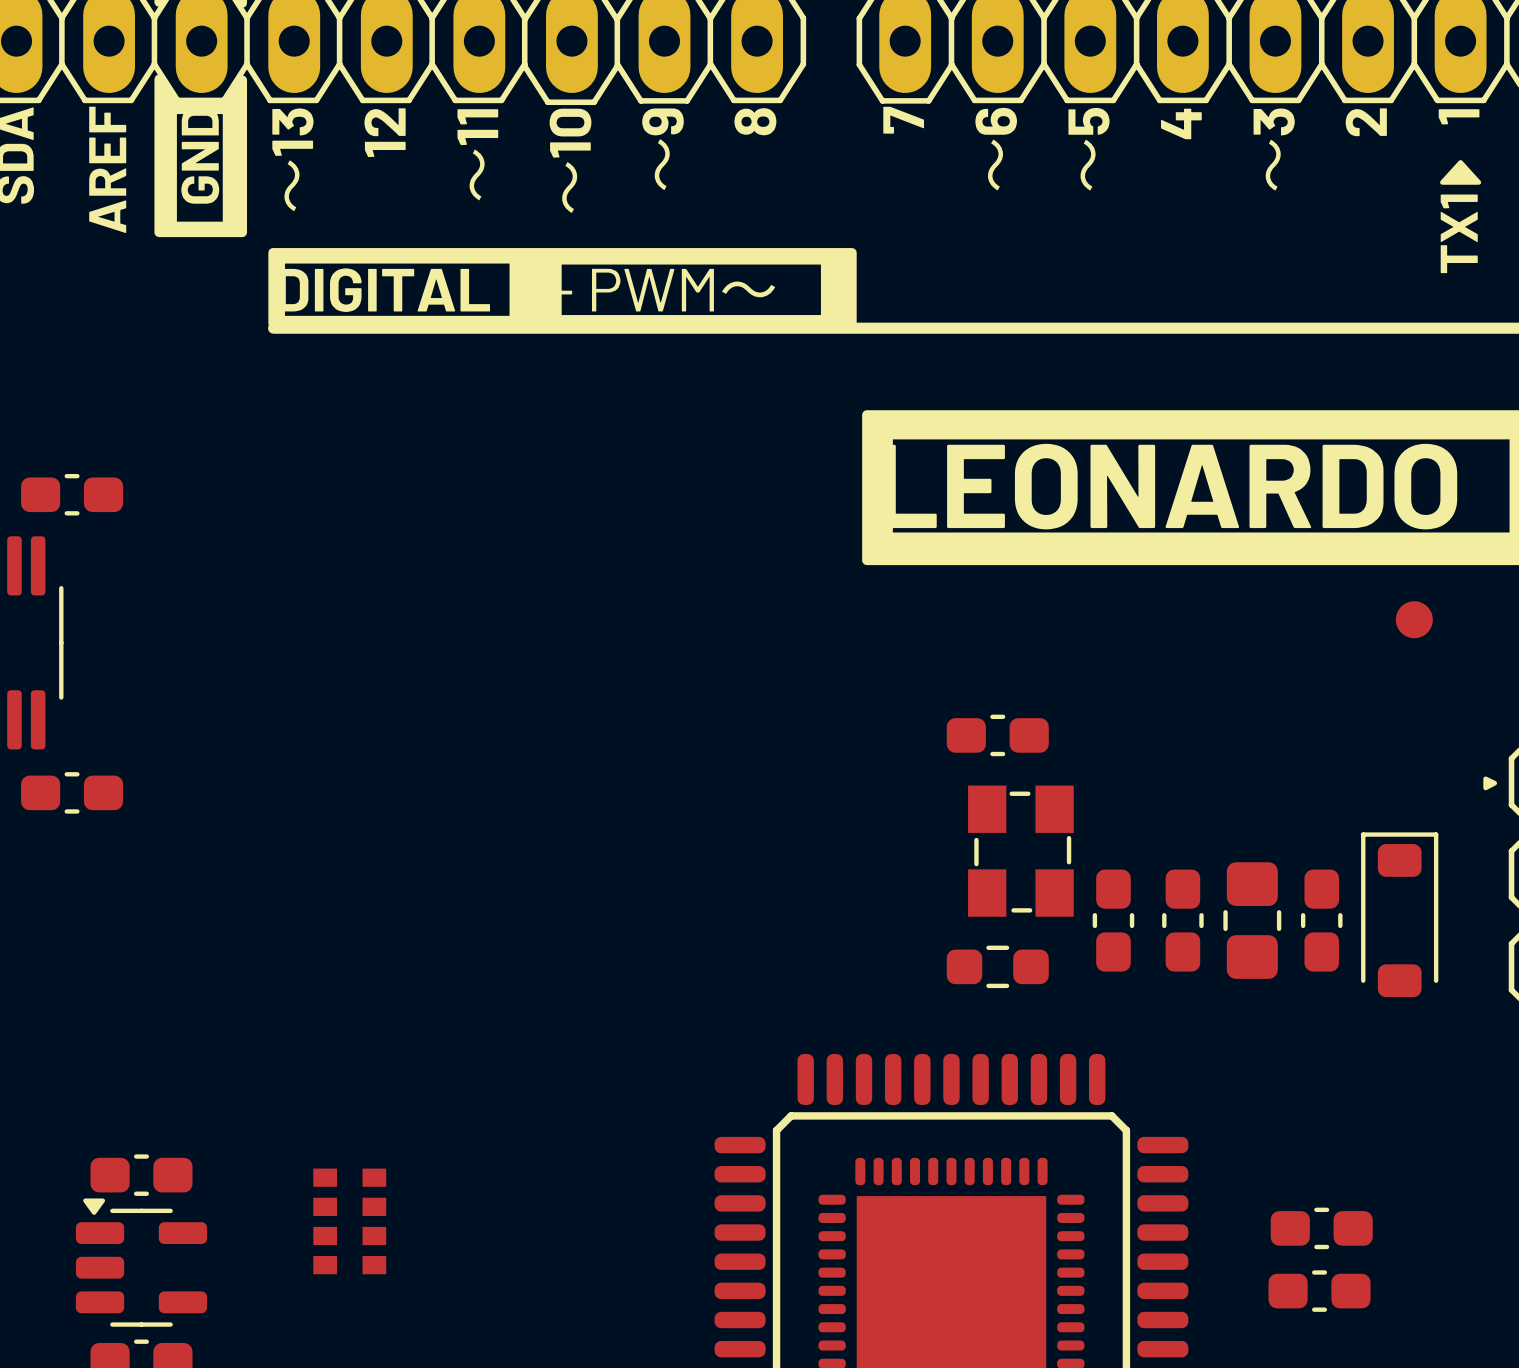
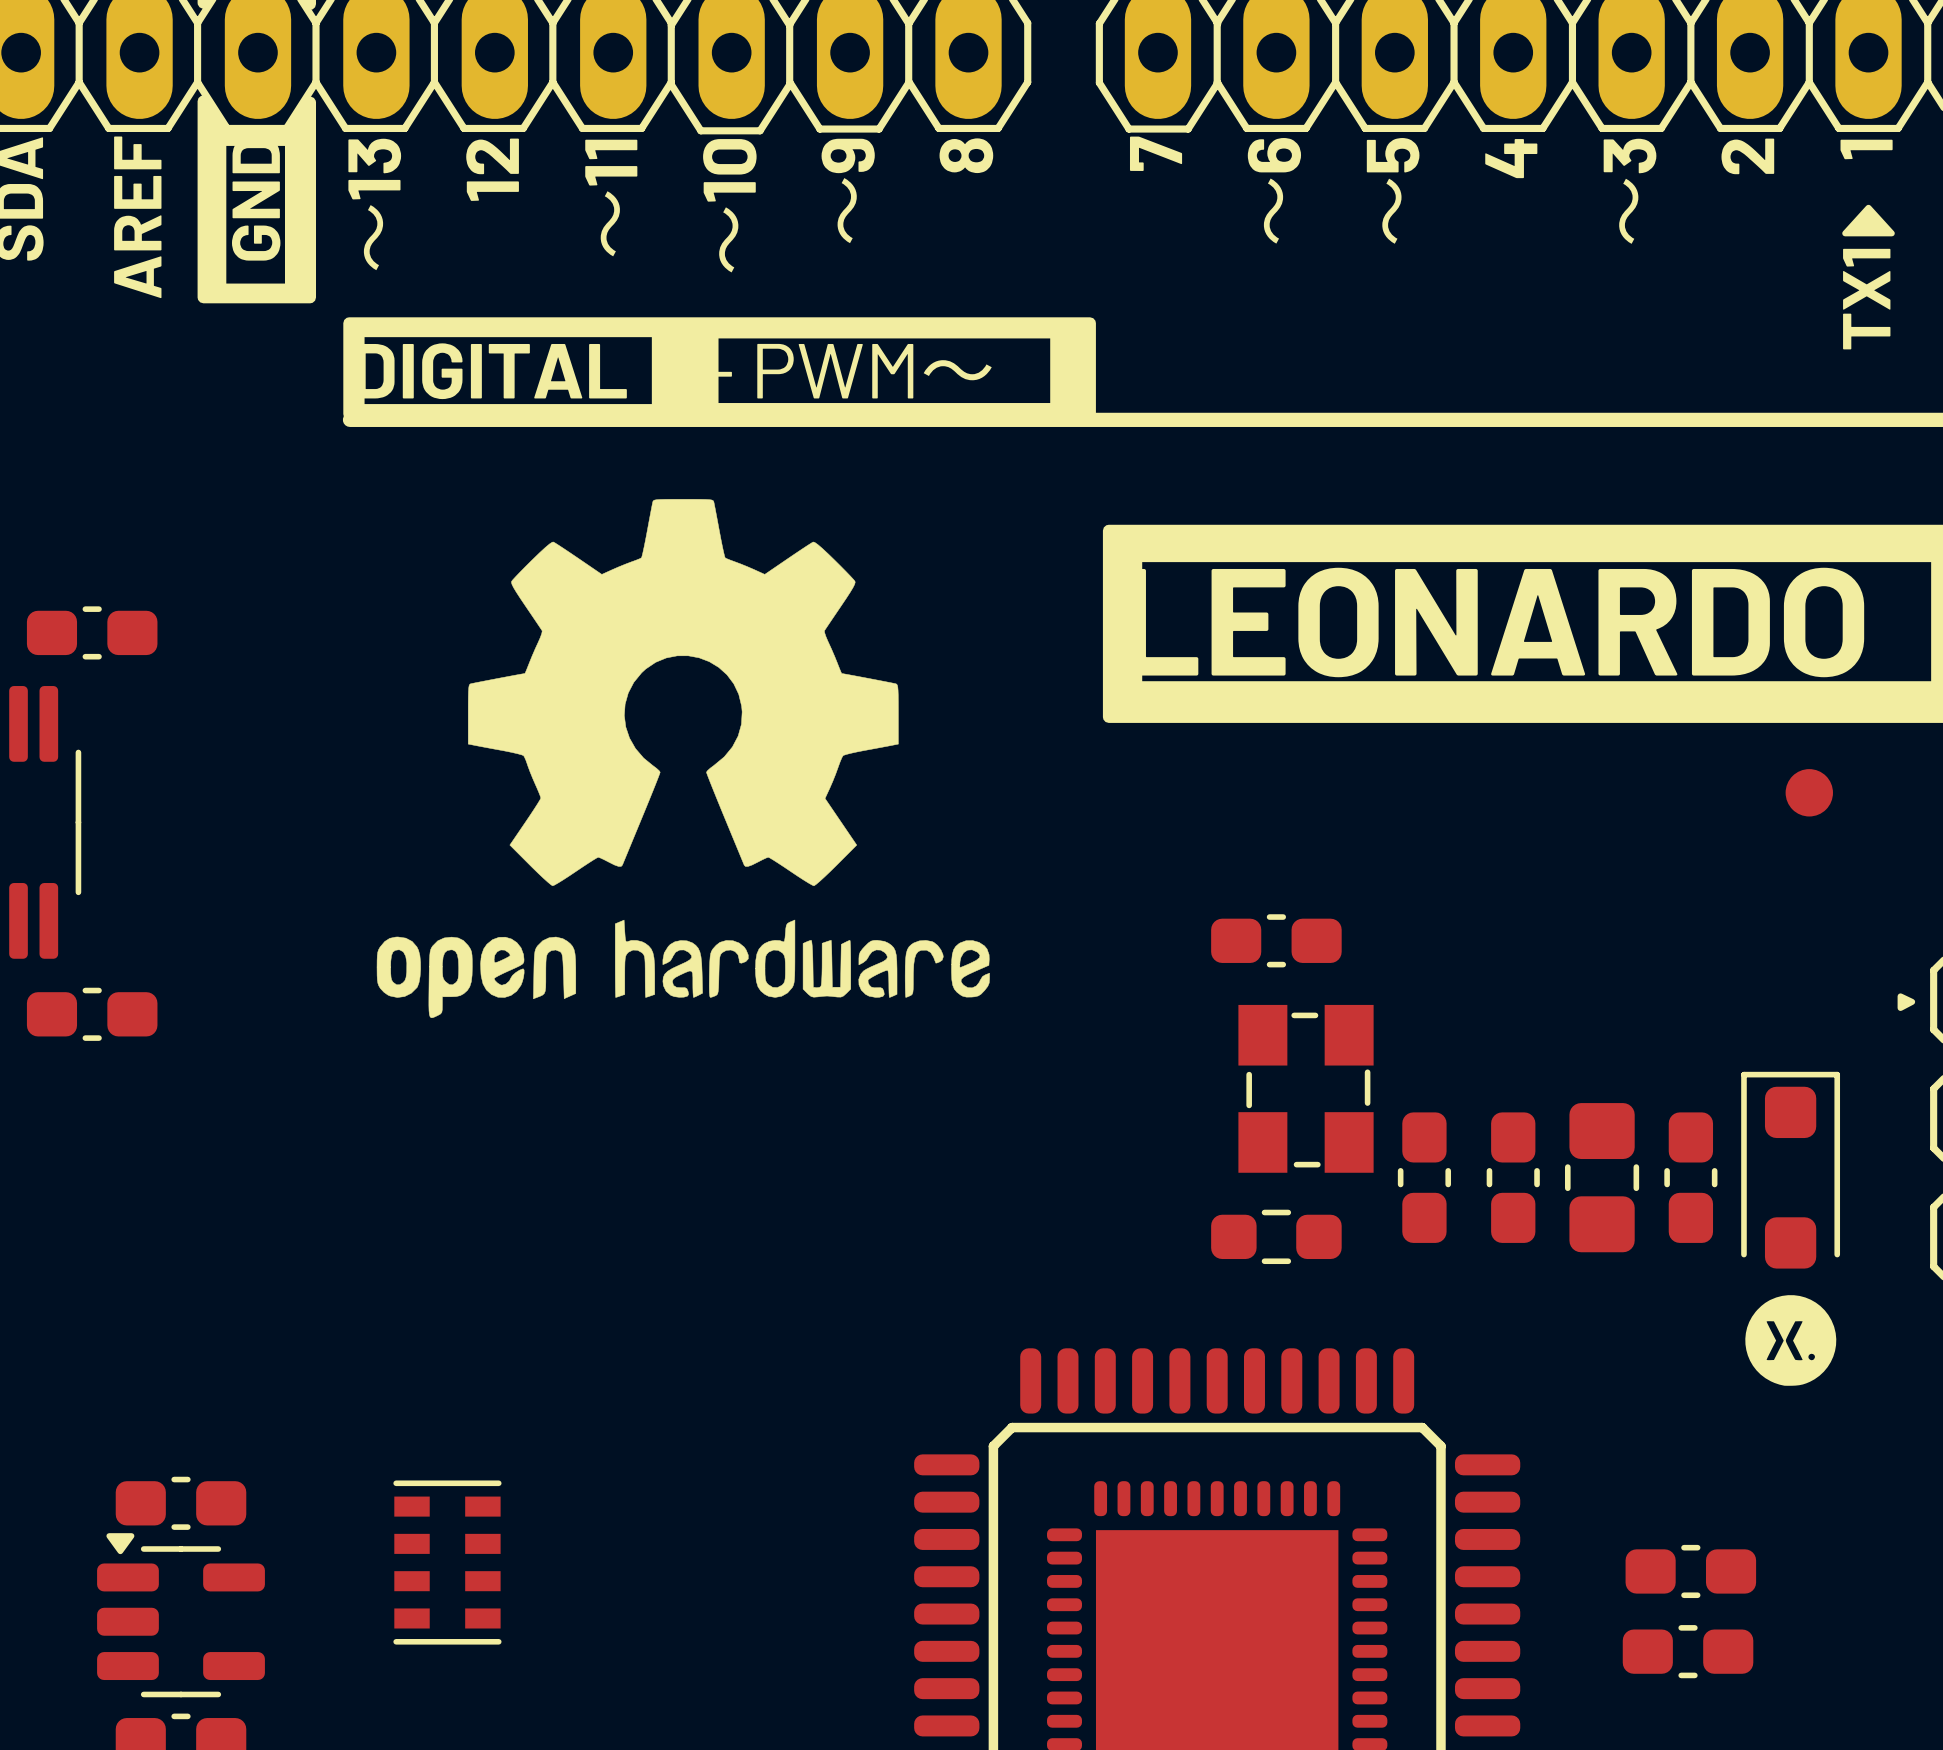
drawing: none -> [376, 499, 990, 1019]
part footprint: [1361, 832, 1439, 998] -> [1741, 1071, 1841, 1269]
drawing: none -> [1745, 1295, 1837, 1386]
part footprint: [313, 1168, 387, 1275] -> [393, 1480, 502, 1645]

